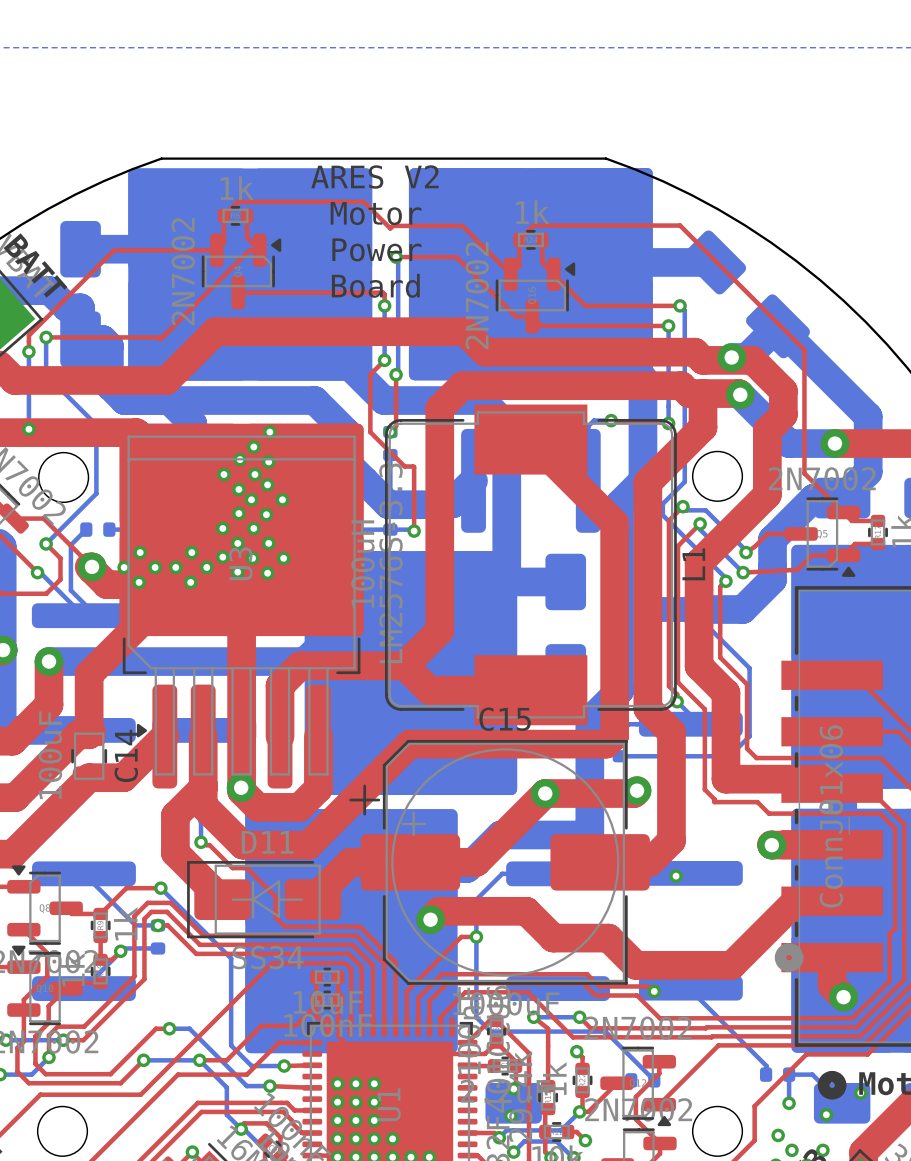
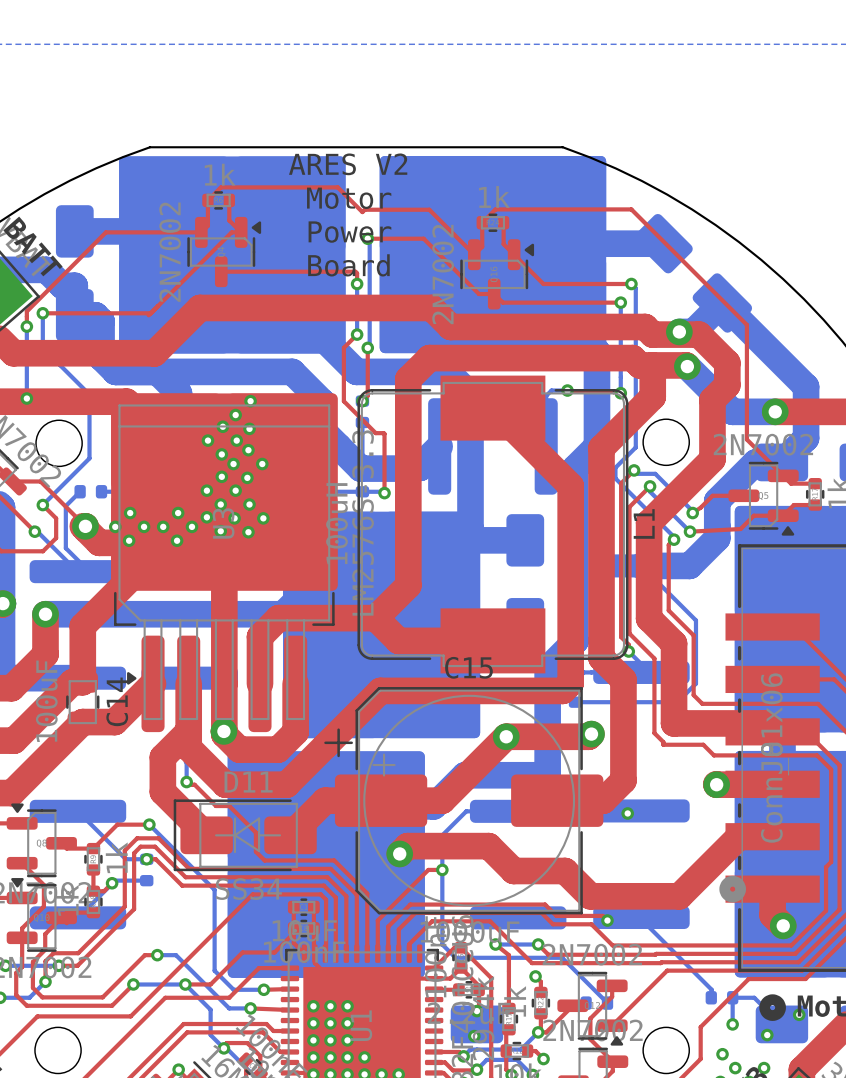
top track: none -> (434, 1062) (444, 1062) (452, 1070) (476, 1070)

